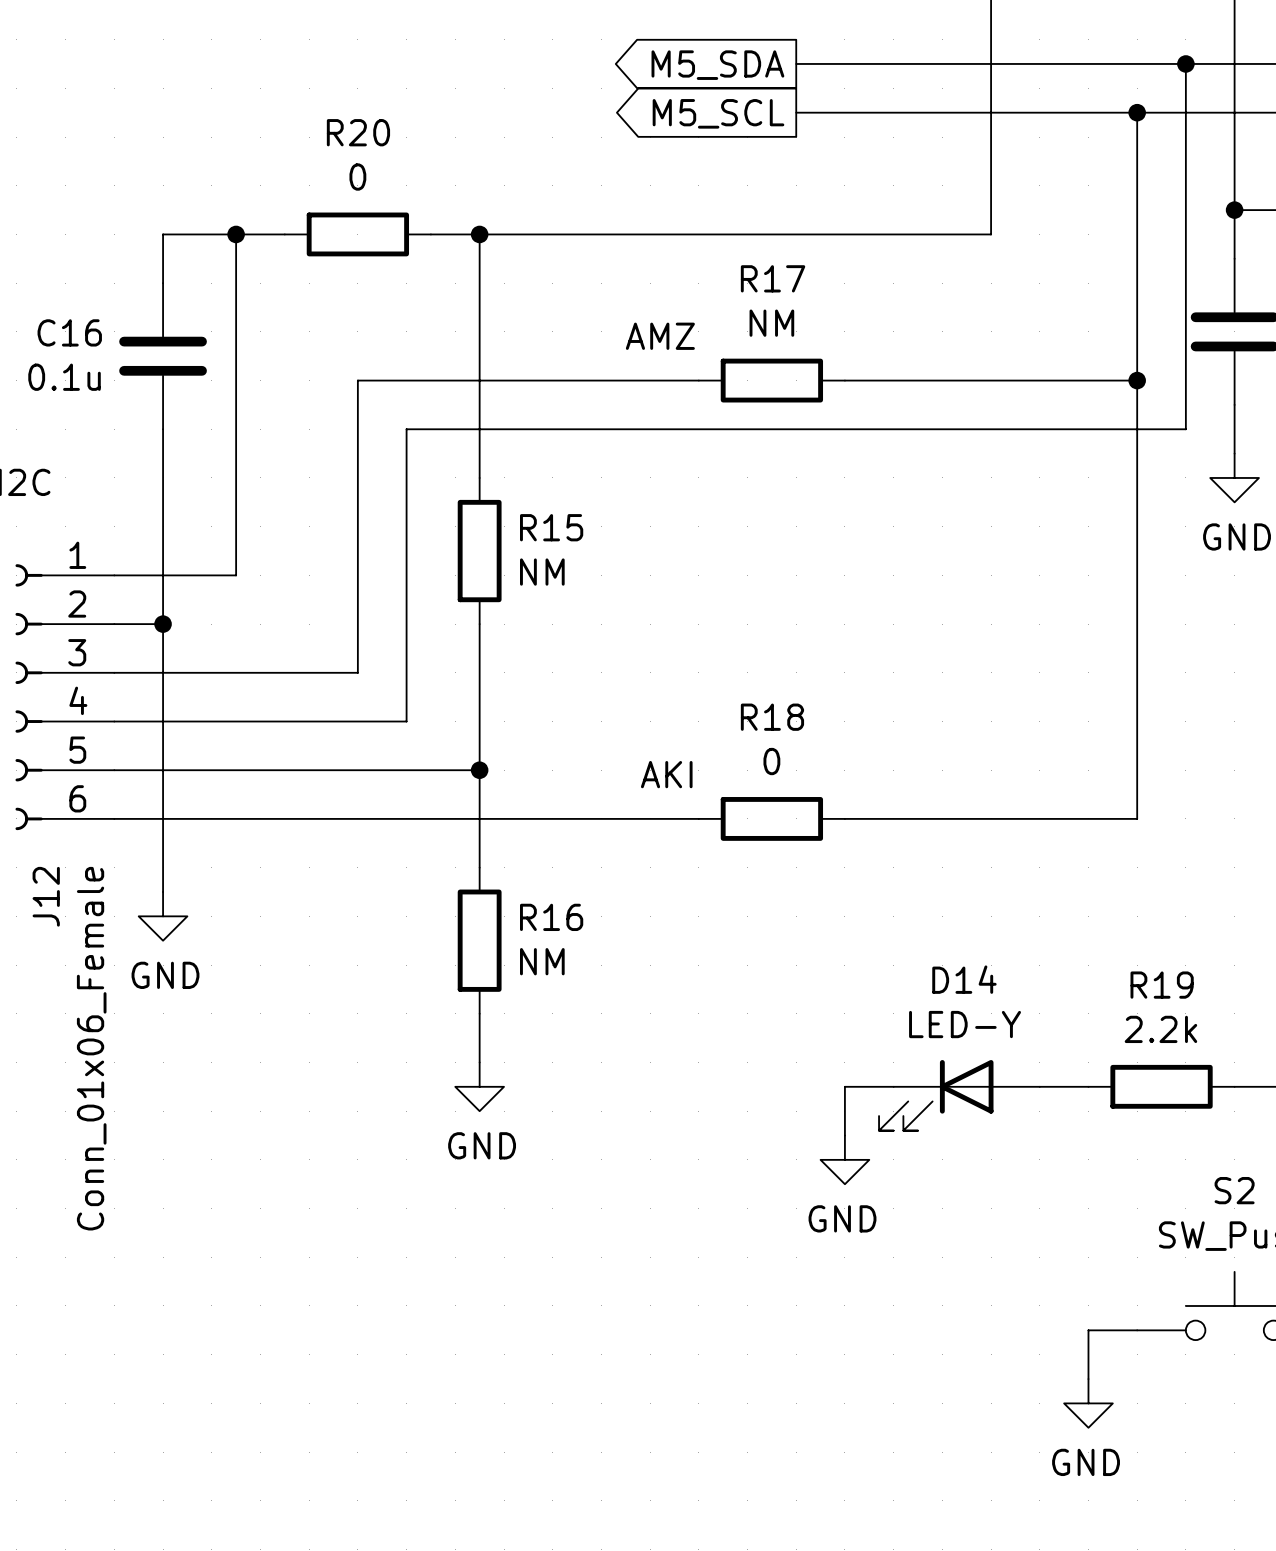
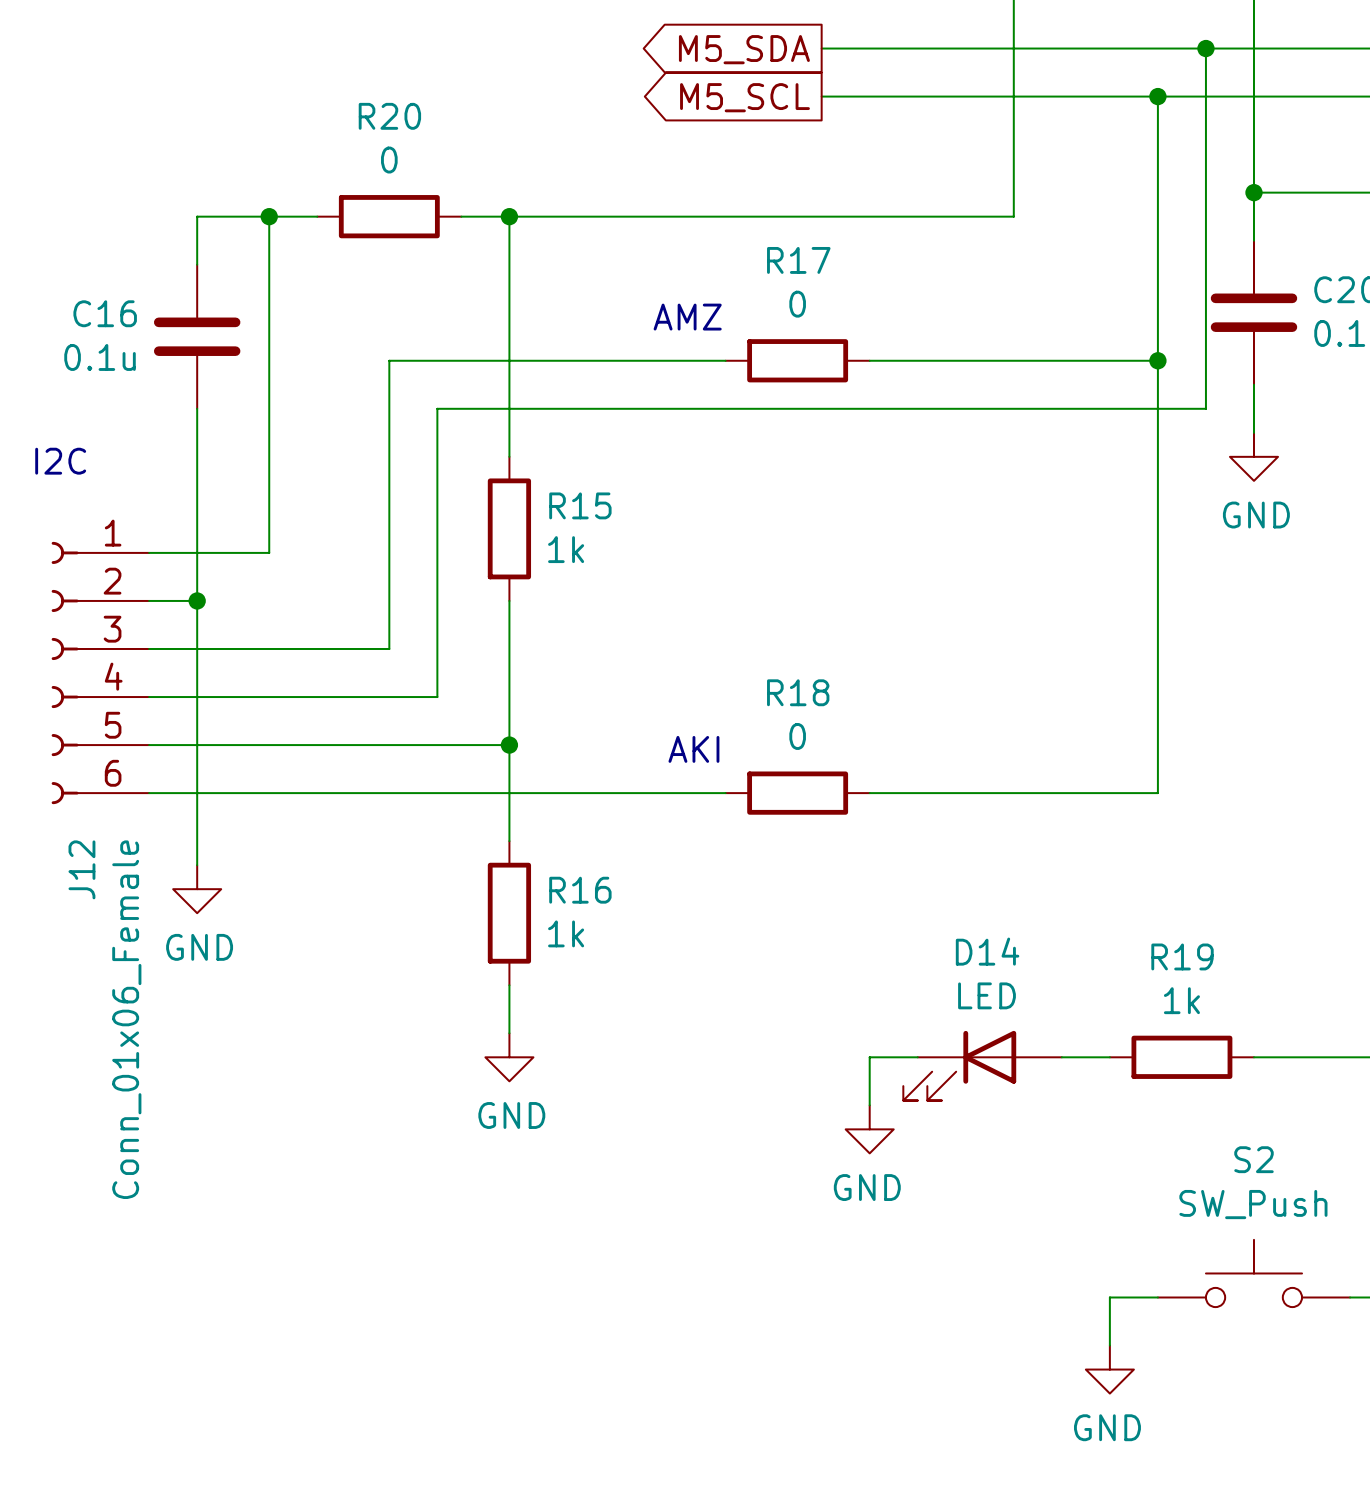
R17 value: NM (771, 323) -> 0 (797, 304)
R15 value: NM (542, 572) -> 1k (566, 549)
R16 value: NM (542, 961) -> 1k (566, 933)
D14 value: LED-Y (965, 1024) -> LED (987, 995)
R19 value: 2.2k (1160, 1029) -> 1k (1181, 1000)

